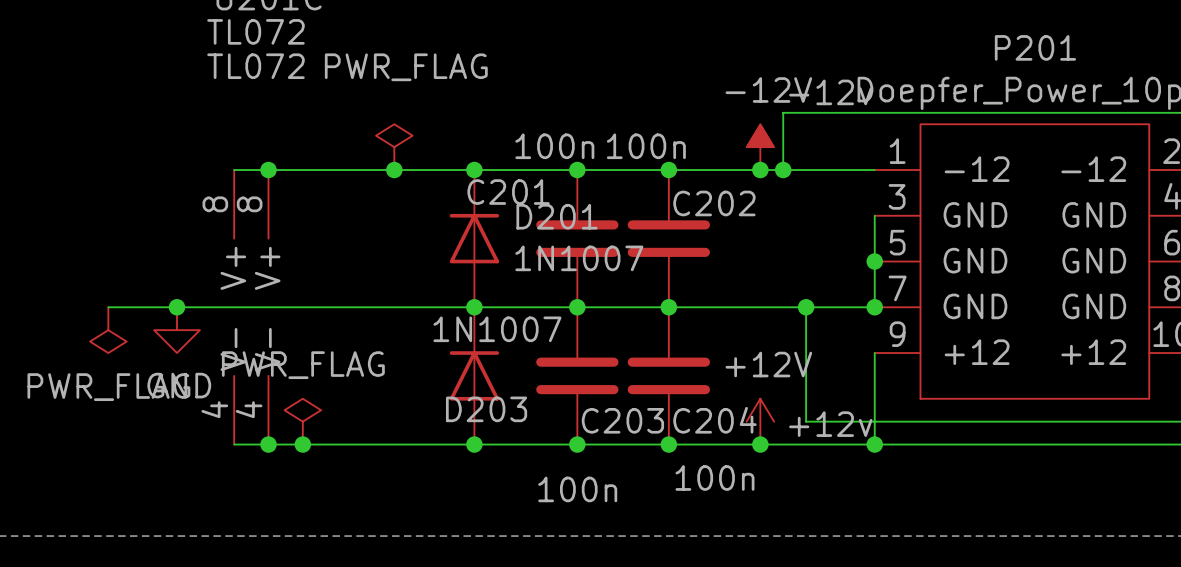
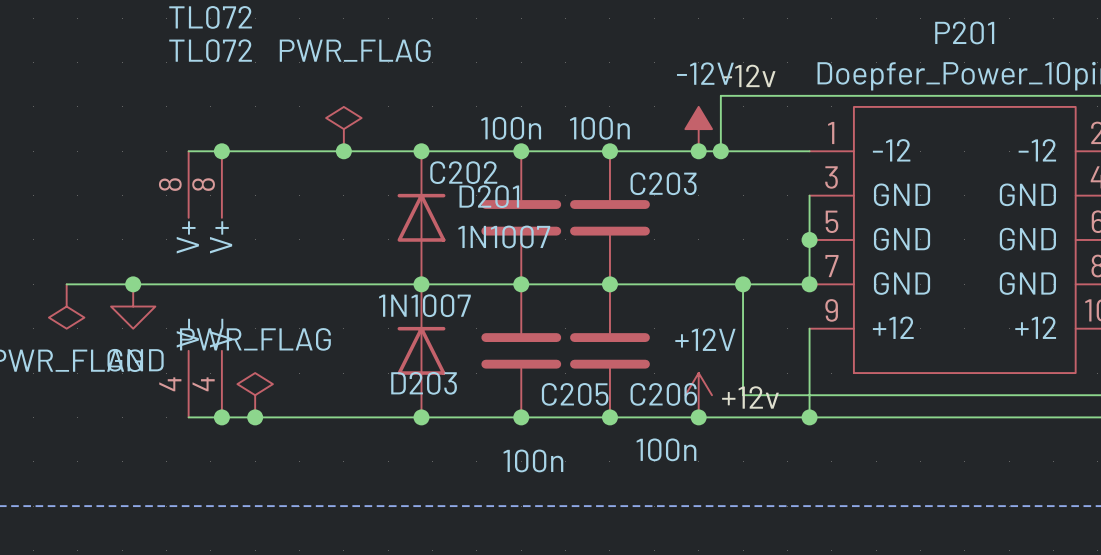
C201 name: C201 (508, 192) -> C202 (463, 172)
C202 name: C202 (714, 203) -> C203 (663, 183)
C203 name: C203 (622, 420) -> C205 (575, 394)
C204 name: C204 (714, 420) -> C206 (663, 394)

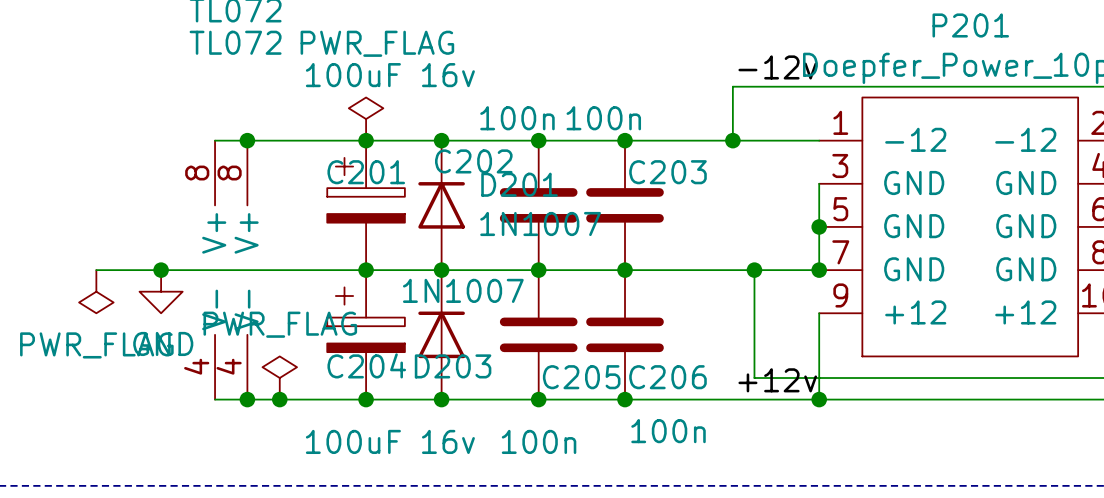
power symbol: -12V (698, 129) -> none
junction: (698, 151) -> none
C201: none -> 100uF 16v (366, 205)
junction: none -> (366, 270)
C204: none -> 100uF 16v (366, 334)
power symbol: +12V (698, 395) -> none
junction: none -> (366, 399)
junction: (698, 417) -> none

